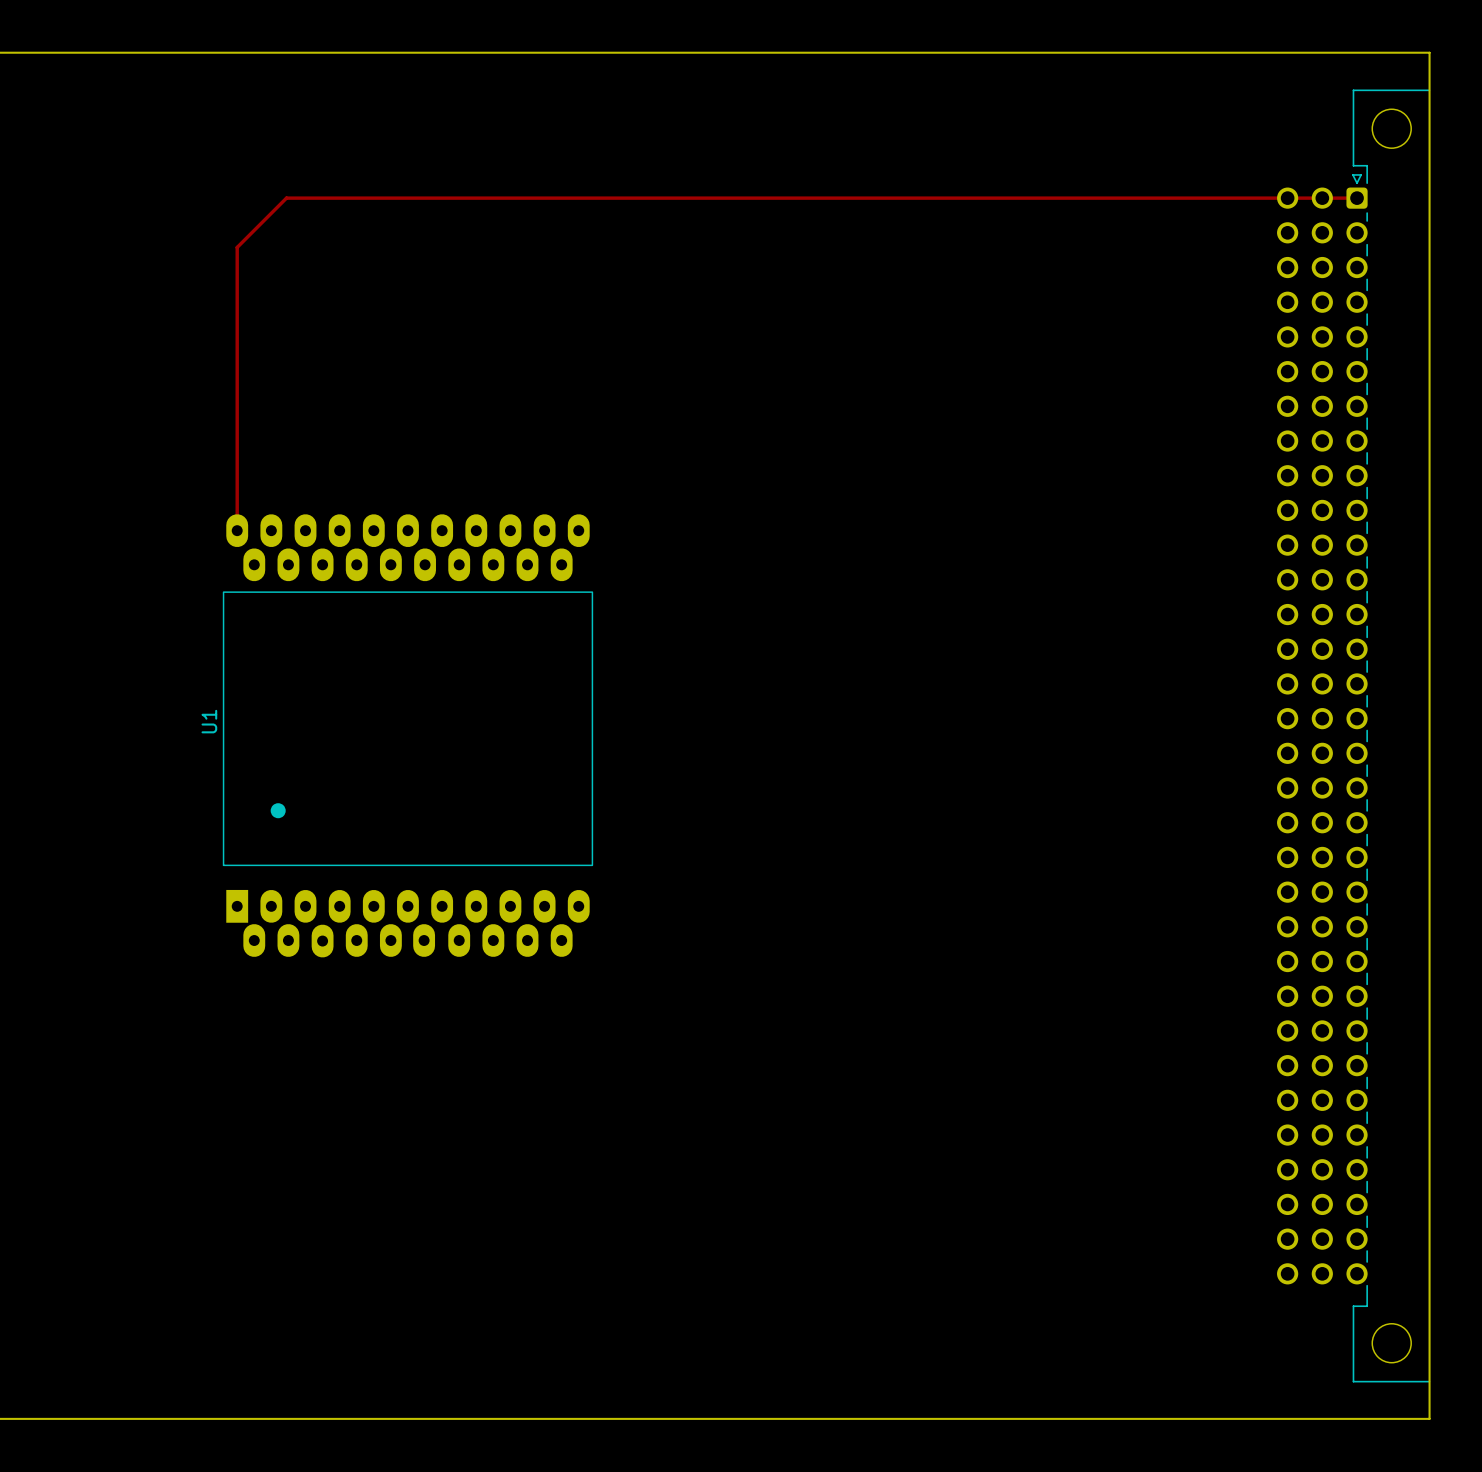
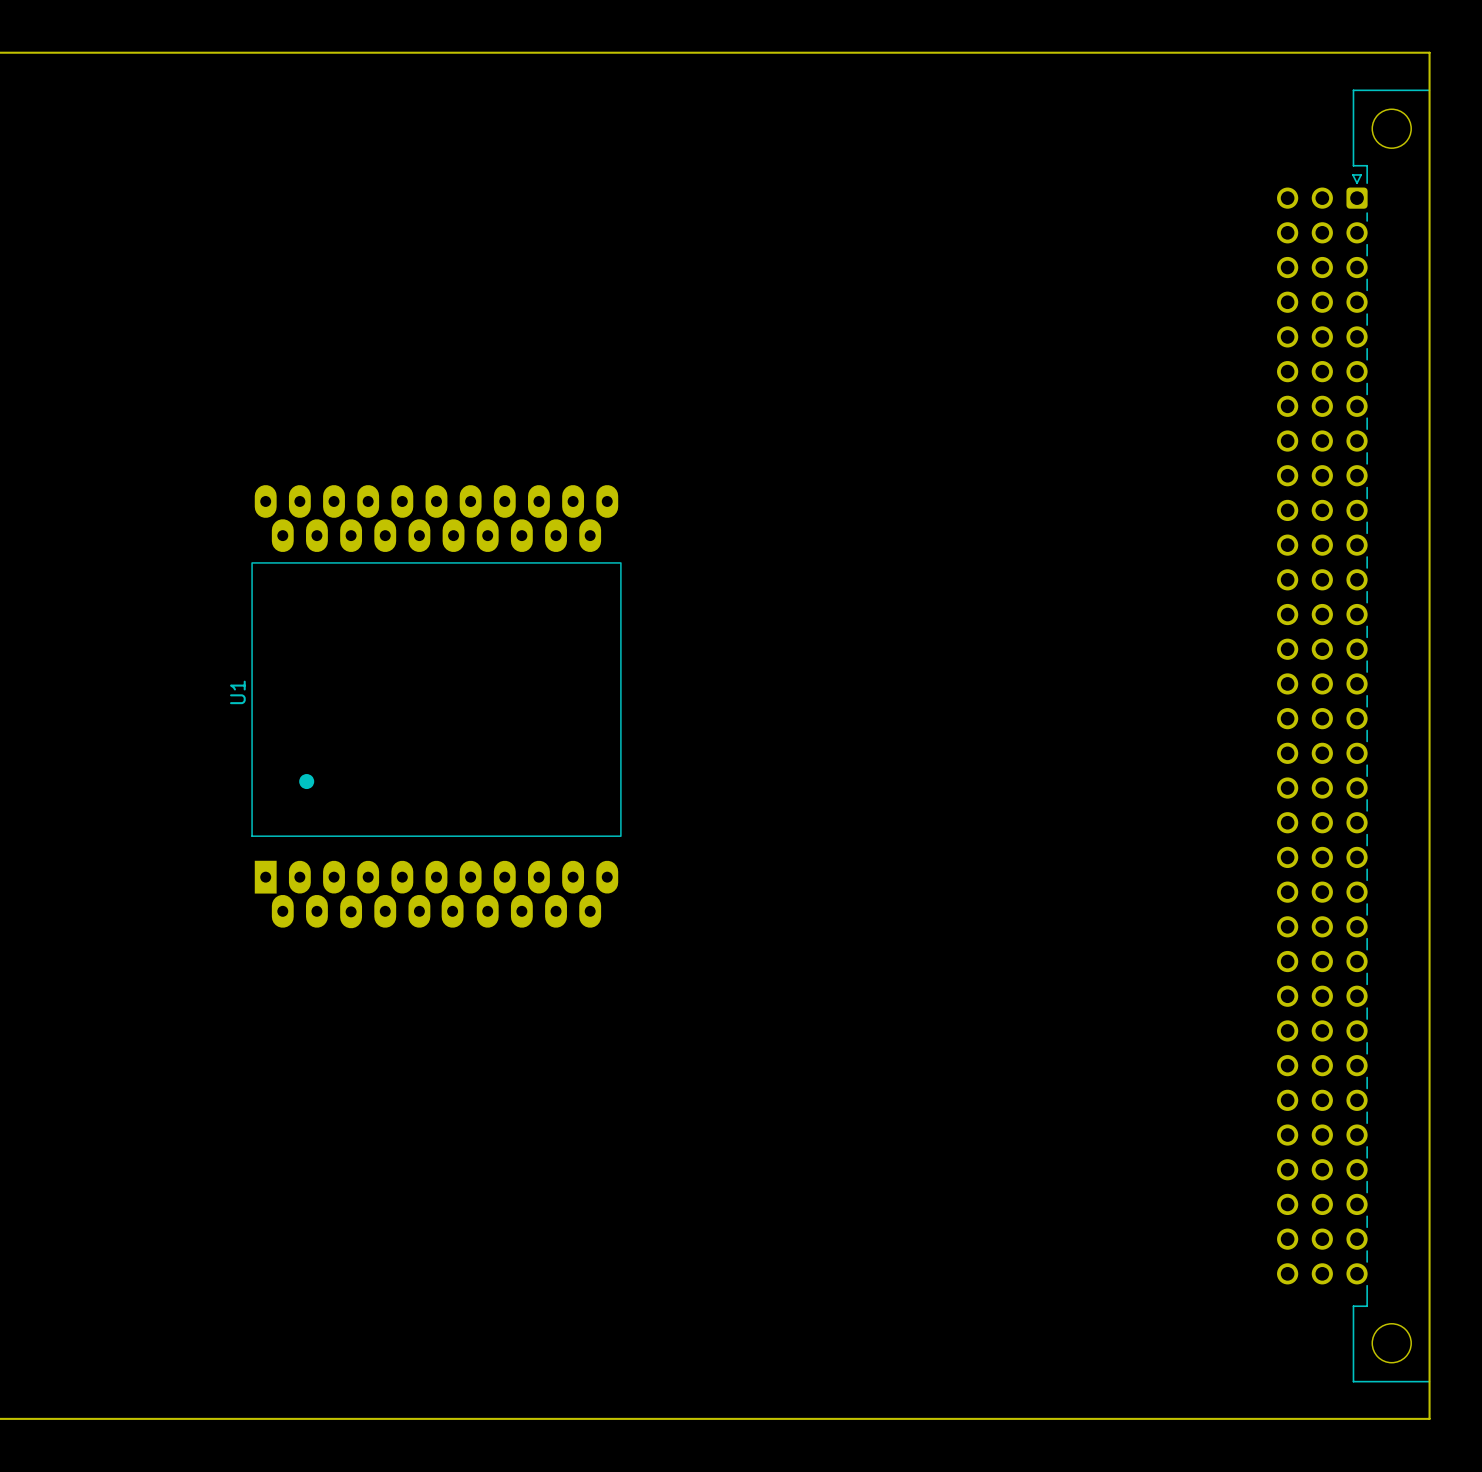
track: (1357, 198) (286, 198) (237, 247) (237, 530) -> none
U1 position: (407, 735) -> (436, 706)

